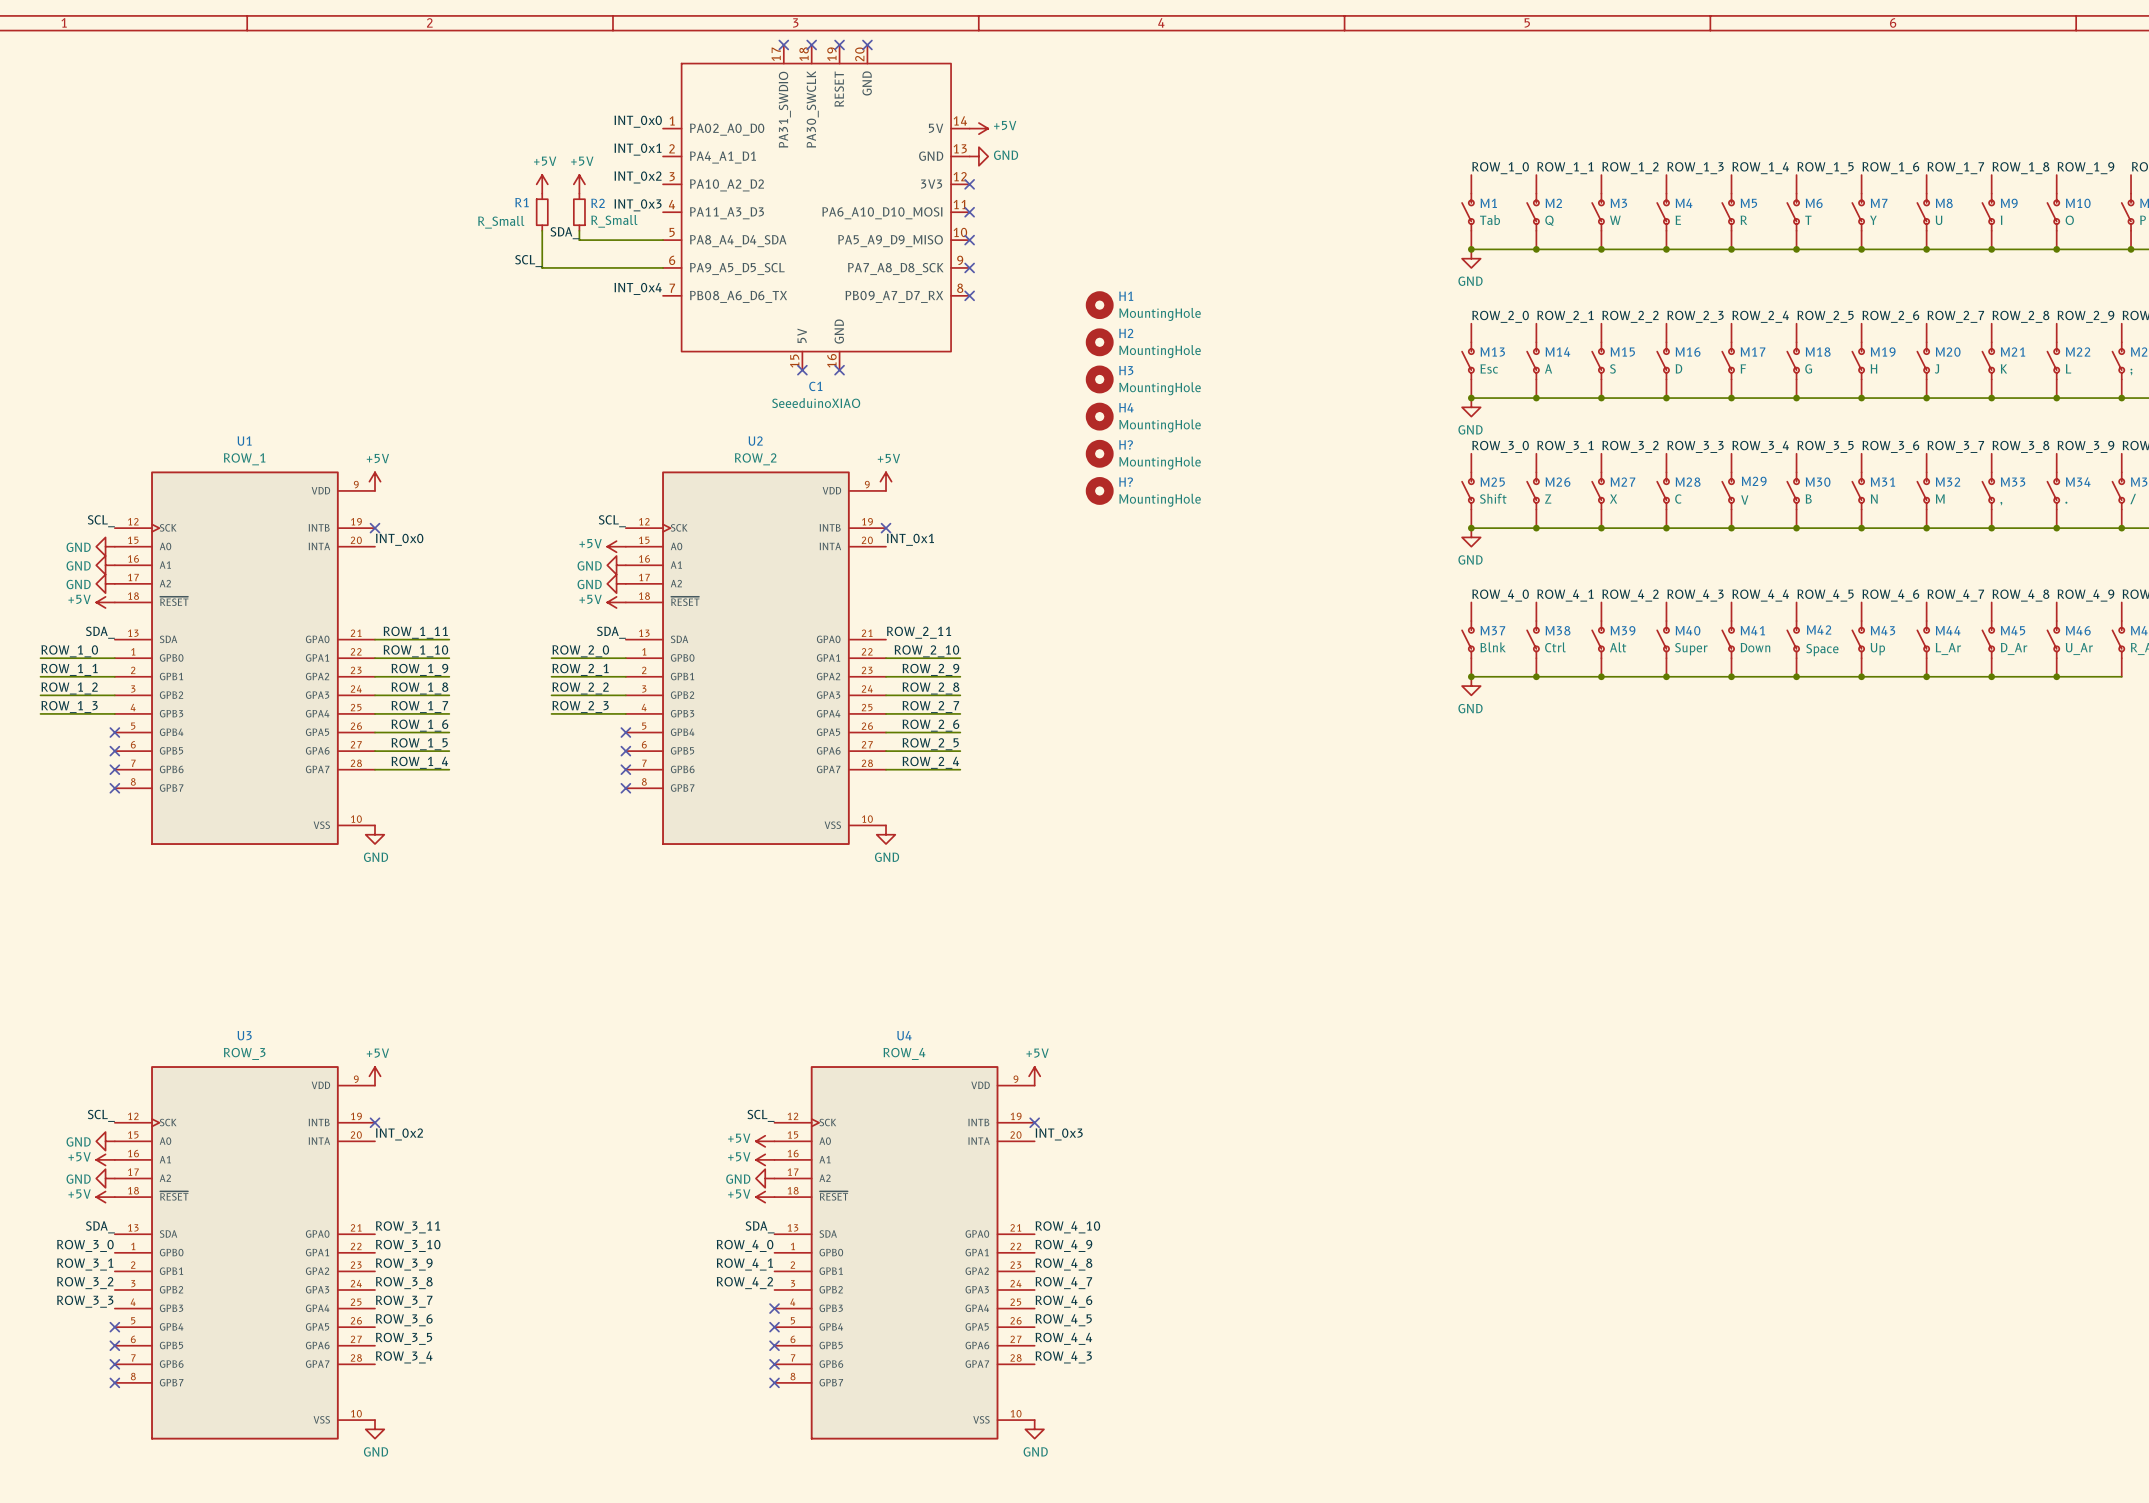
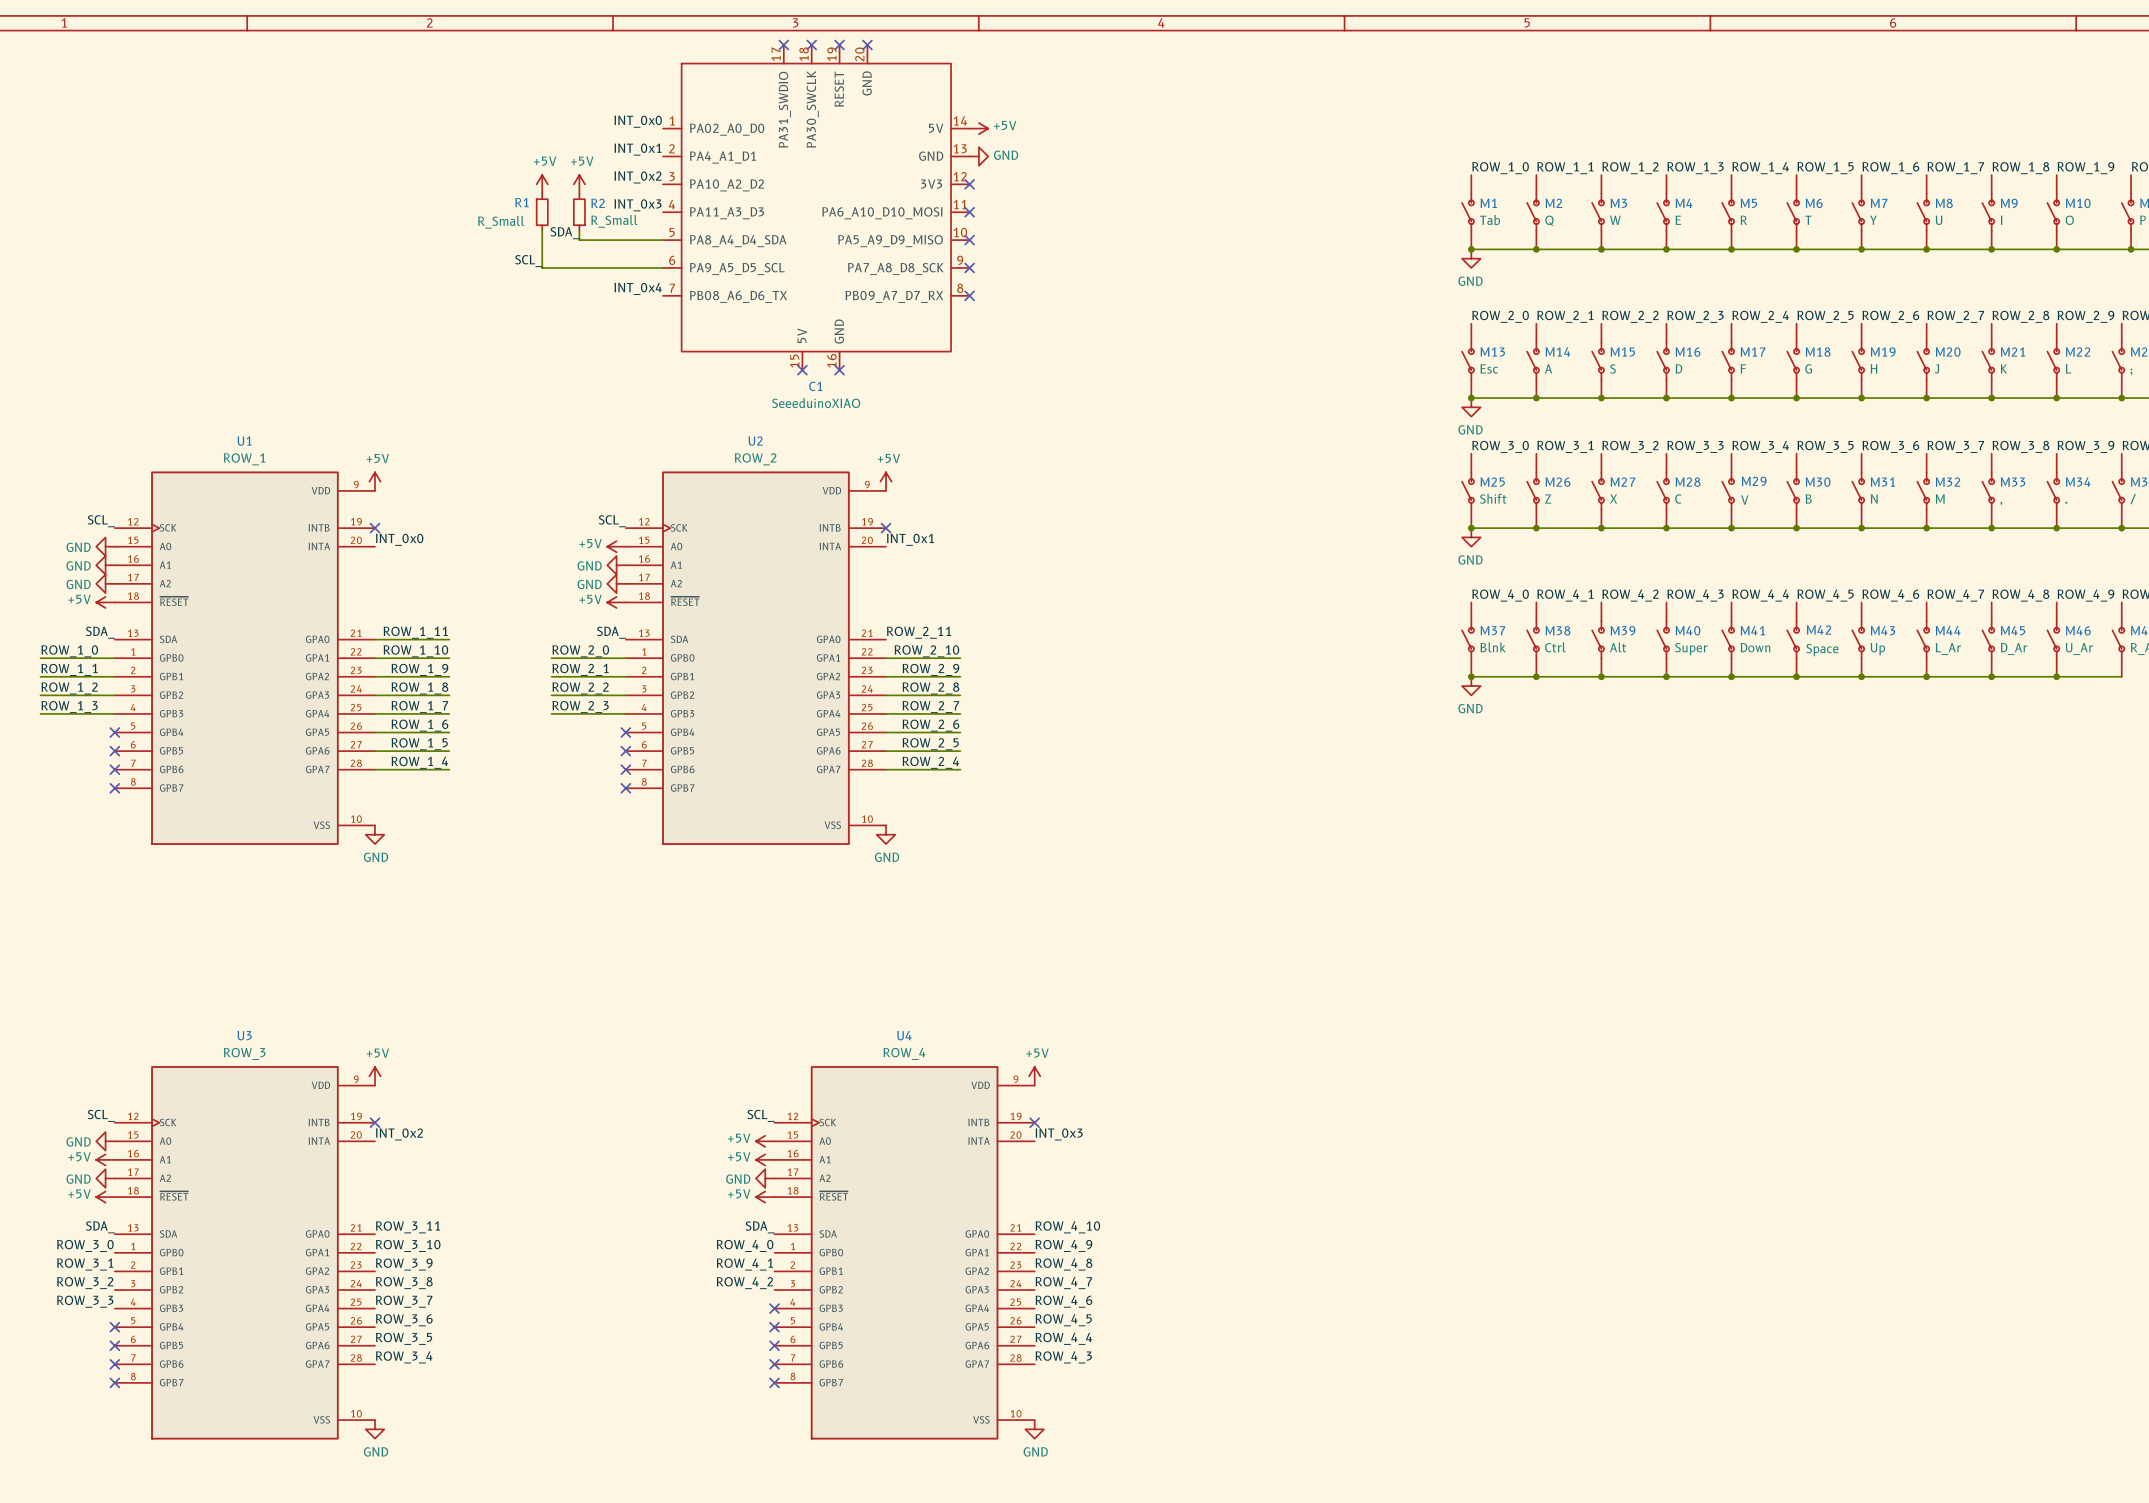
H1: MountingHole (1099, 305) -> none
H2: MountingHole (1099, 342) -> none
H3: MountingHole (1099, 379) -> none
H4: MountingHole (1099, 416) -> none
H?: MountingHole (1099, 453) -> none
H?: MountingHole (1099, 490) -> none

